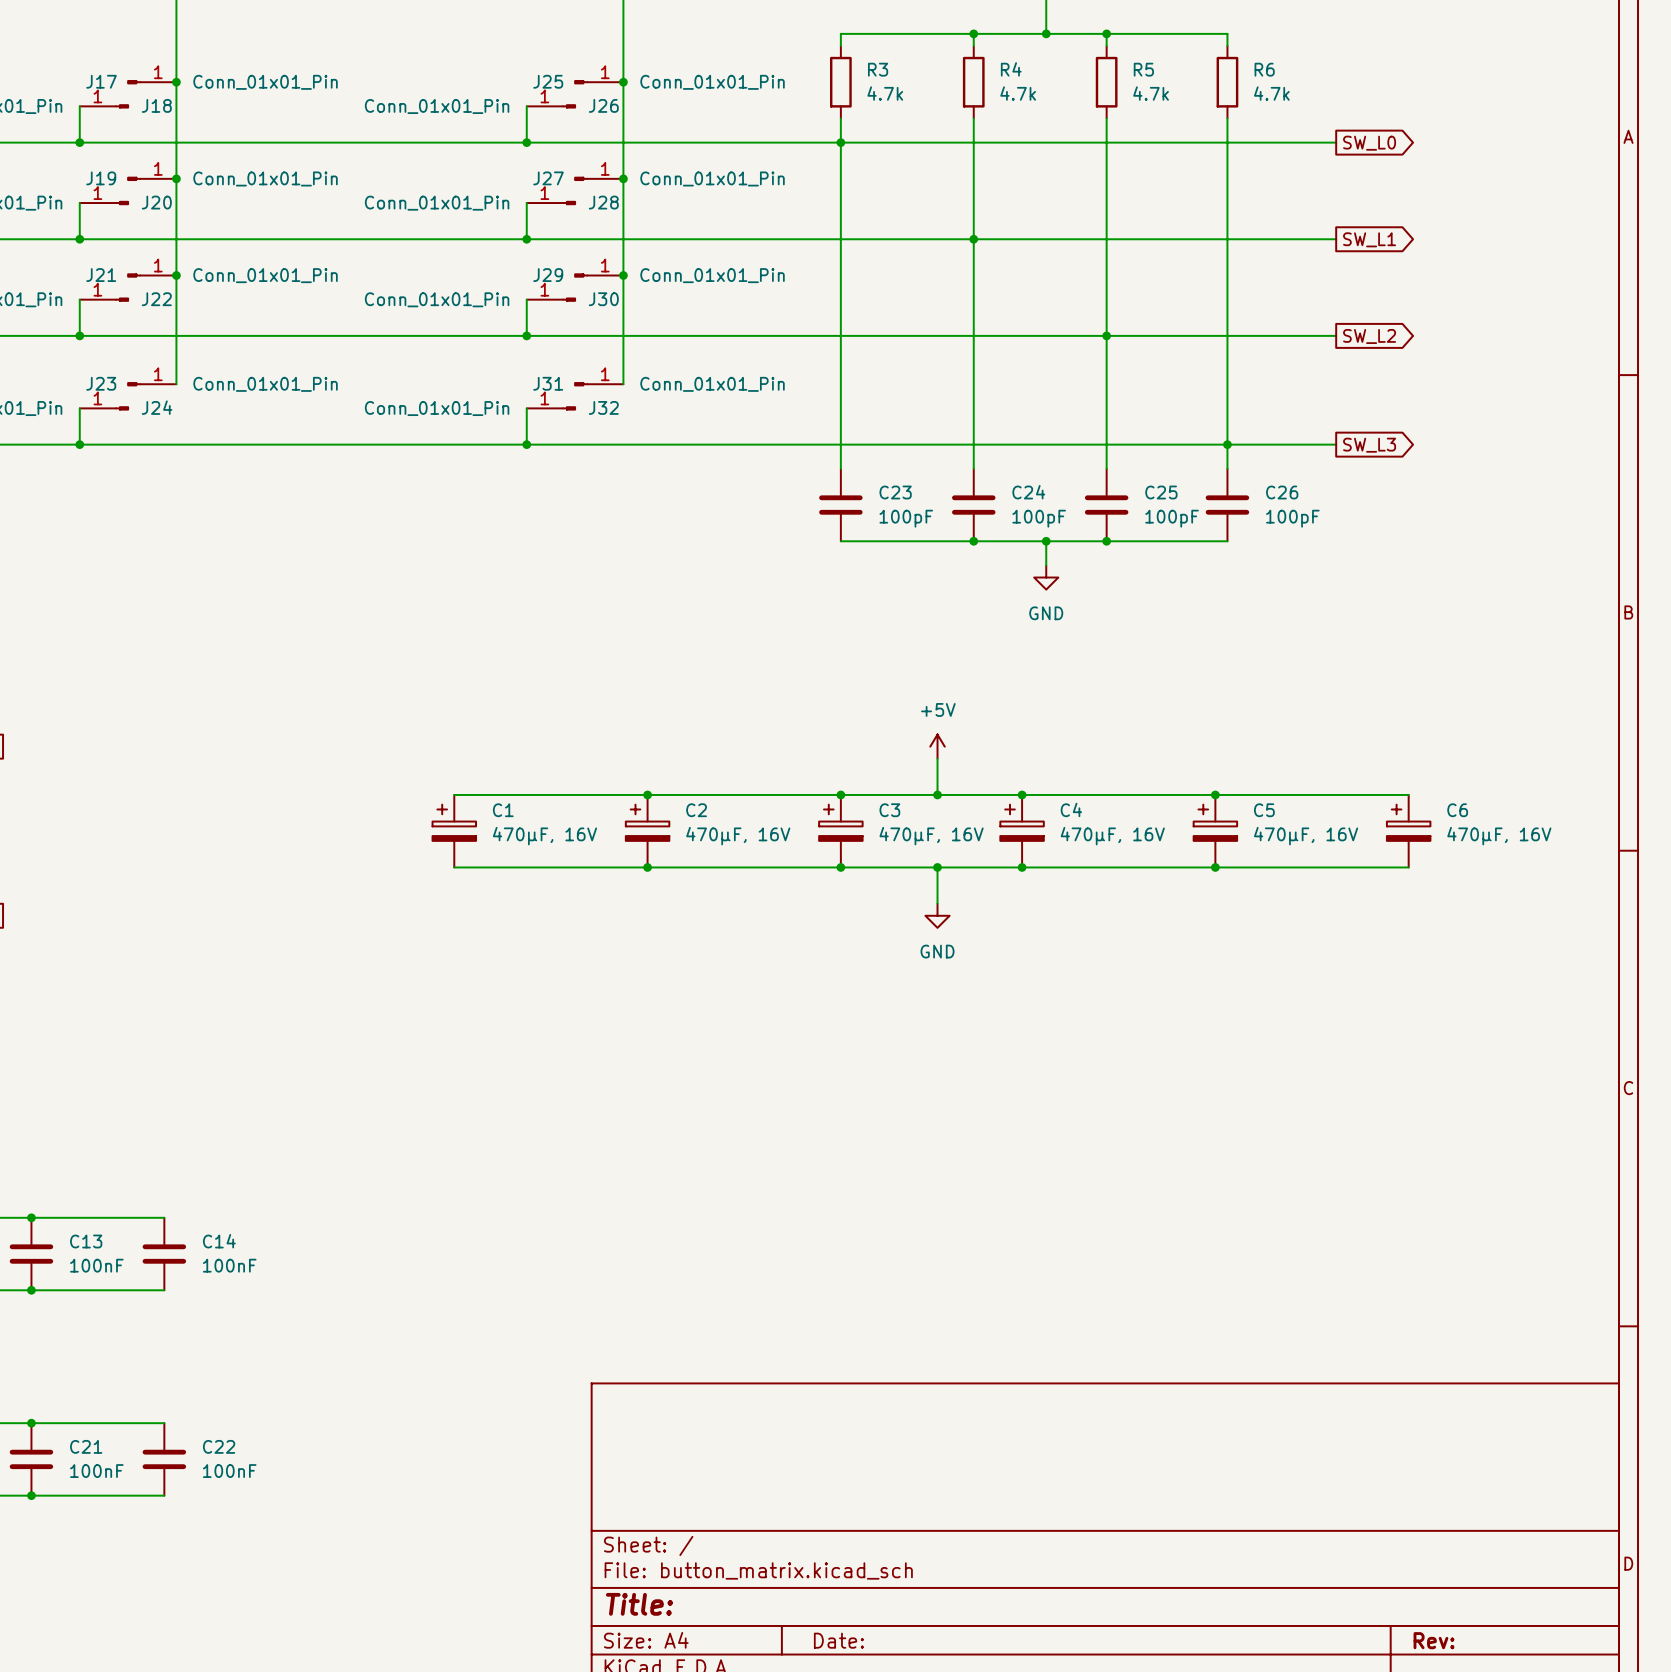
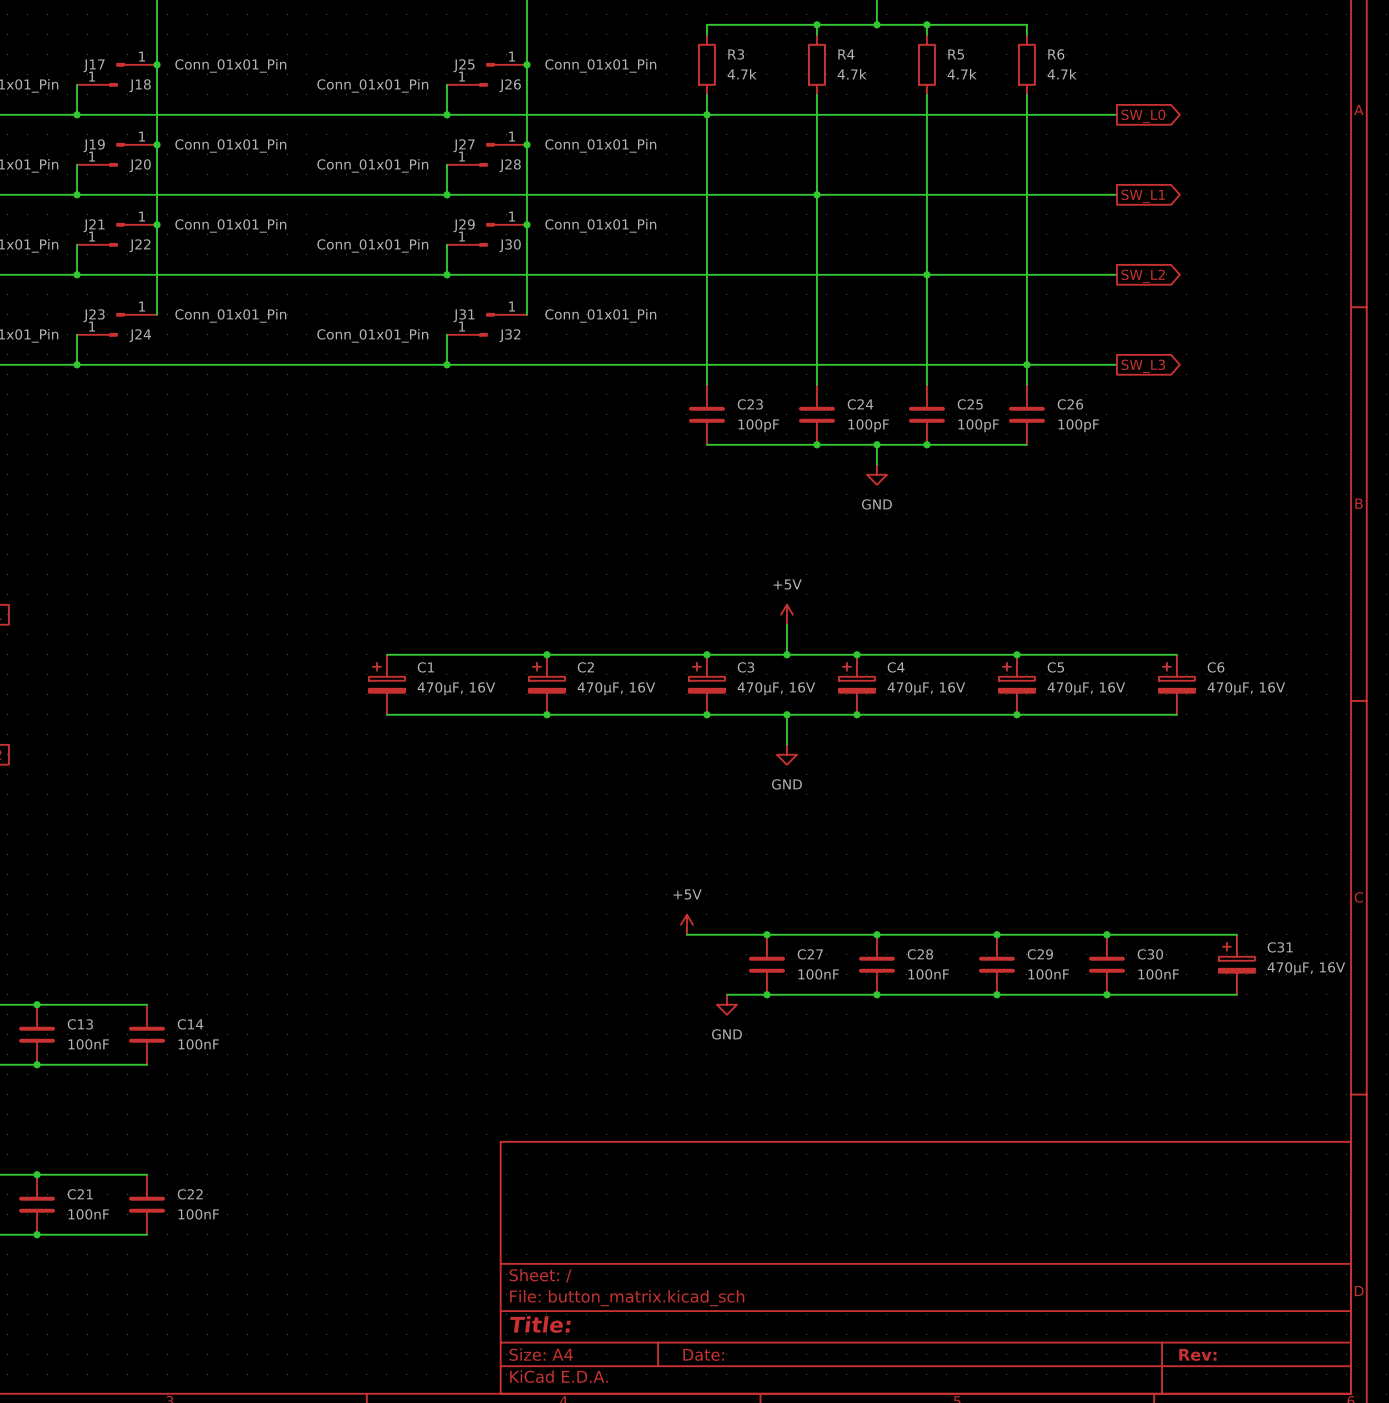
power symbol: none -> +5V (686, 924)
wire: none -> (686, 934) (1236, 934)
junction: none -> (766, 934)
junction: none -> (876, 934)
junction: none -> (996, 934)
junction: none -> (1106, 934)
C27: none -> 100nF (766, 964)
C28: none -> 100nF (876, 964)
C29: none -> 100nF (996, 964)
C30: none -> 100nF (1106, 964)
C31: none -> 470µF, 16V (1236, 964)
wire: none -> (726, 994) (1236, 994)
junction: none -> (766, 994)
junction: none -> (876, 994)
junction: none -> (996, 994)
junction: none -> (1106, 994)
power symbol: none -> GND (726, 1004)

